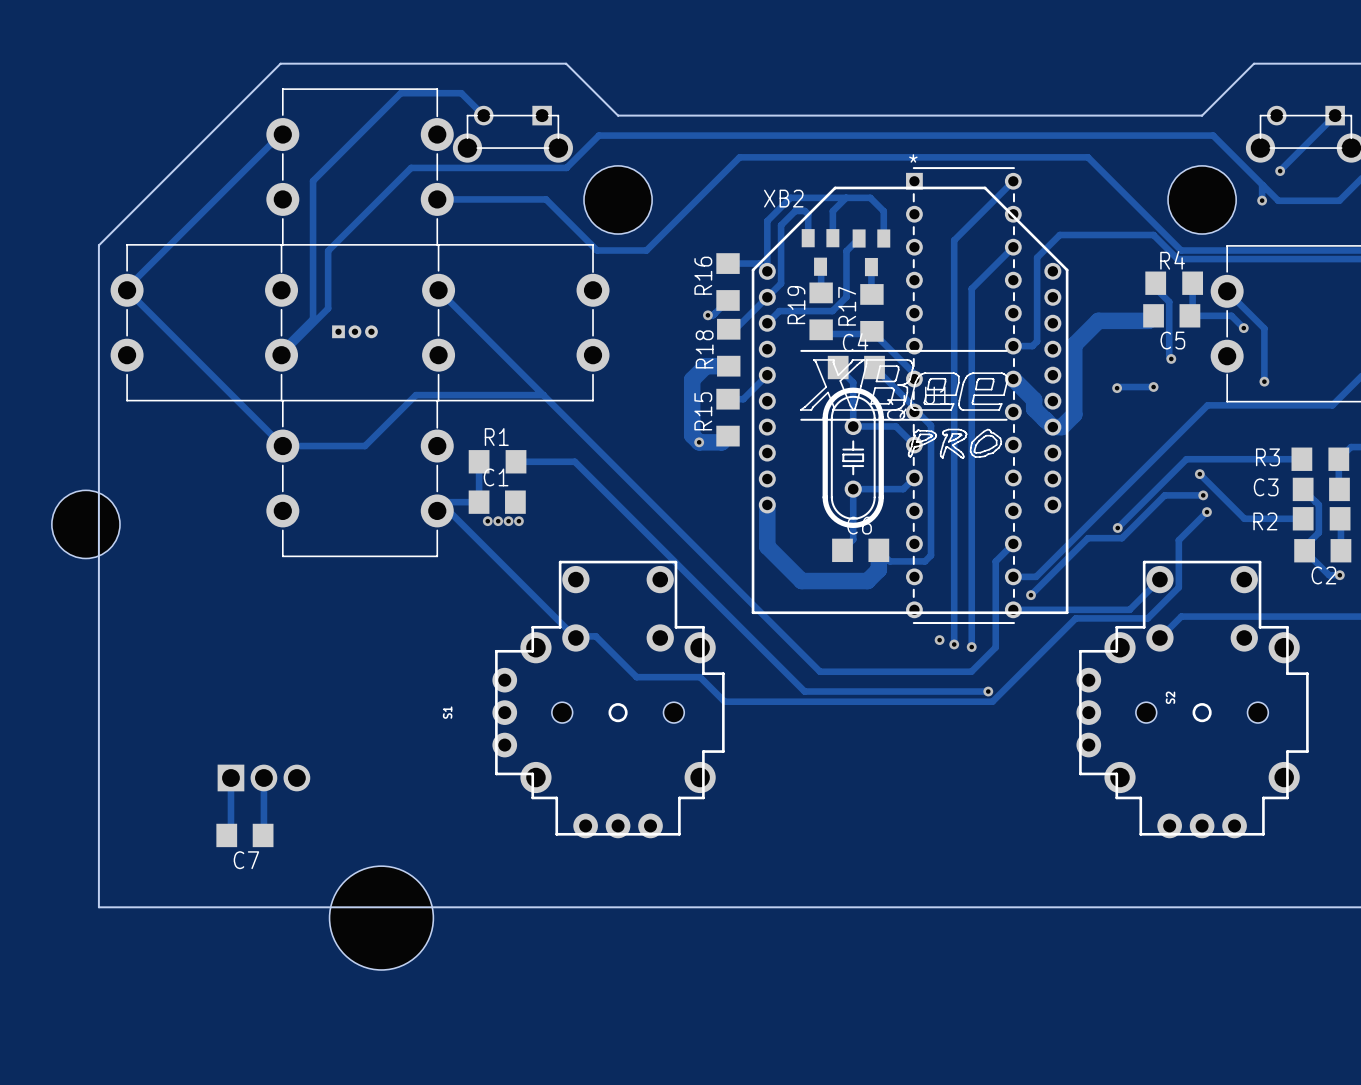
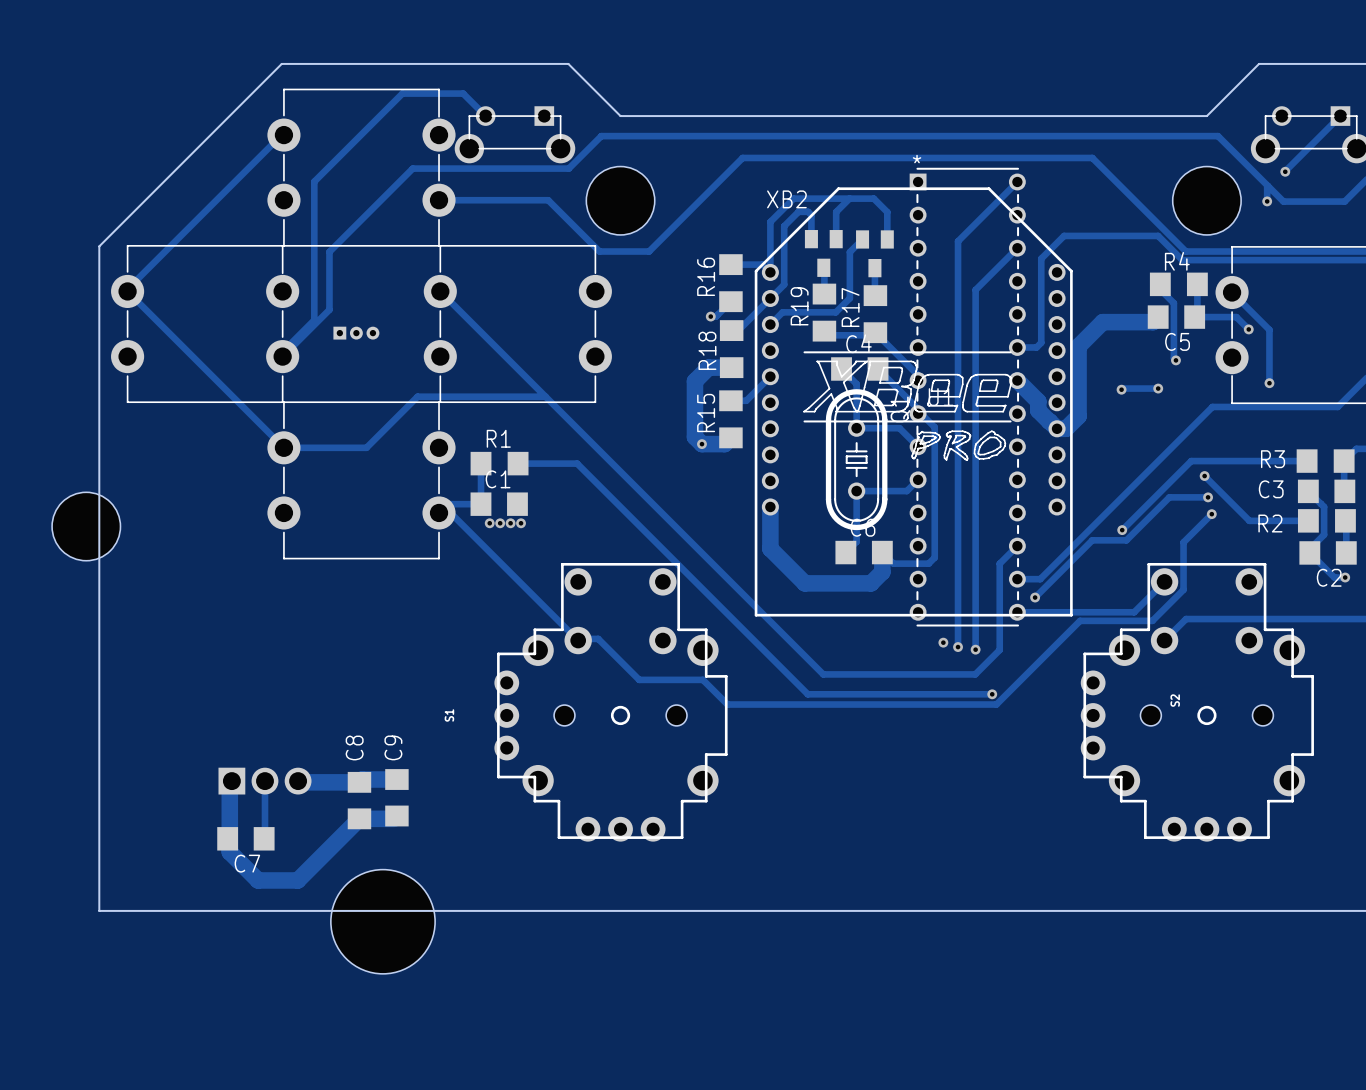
track: none -> (396, 779) (362, 779) (359, 782) (298, 781)
track: (230, 777) (230, 835) (226, 835) -> (231, 781) (229, 781) (229, 852) (258, 880) (297, 880) (359, 818) (396, 818) (396, 816)
C9: none -> (396, 797)
C8: none -> (359, 800)

